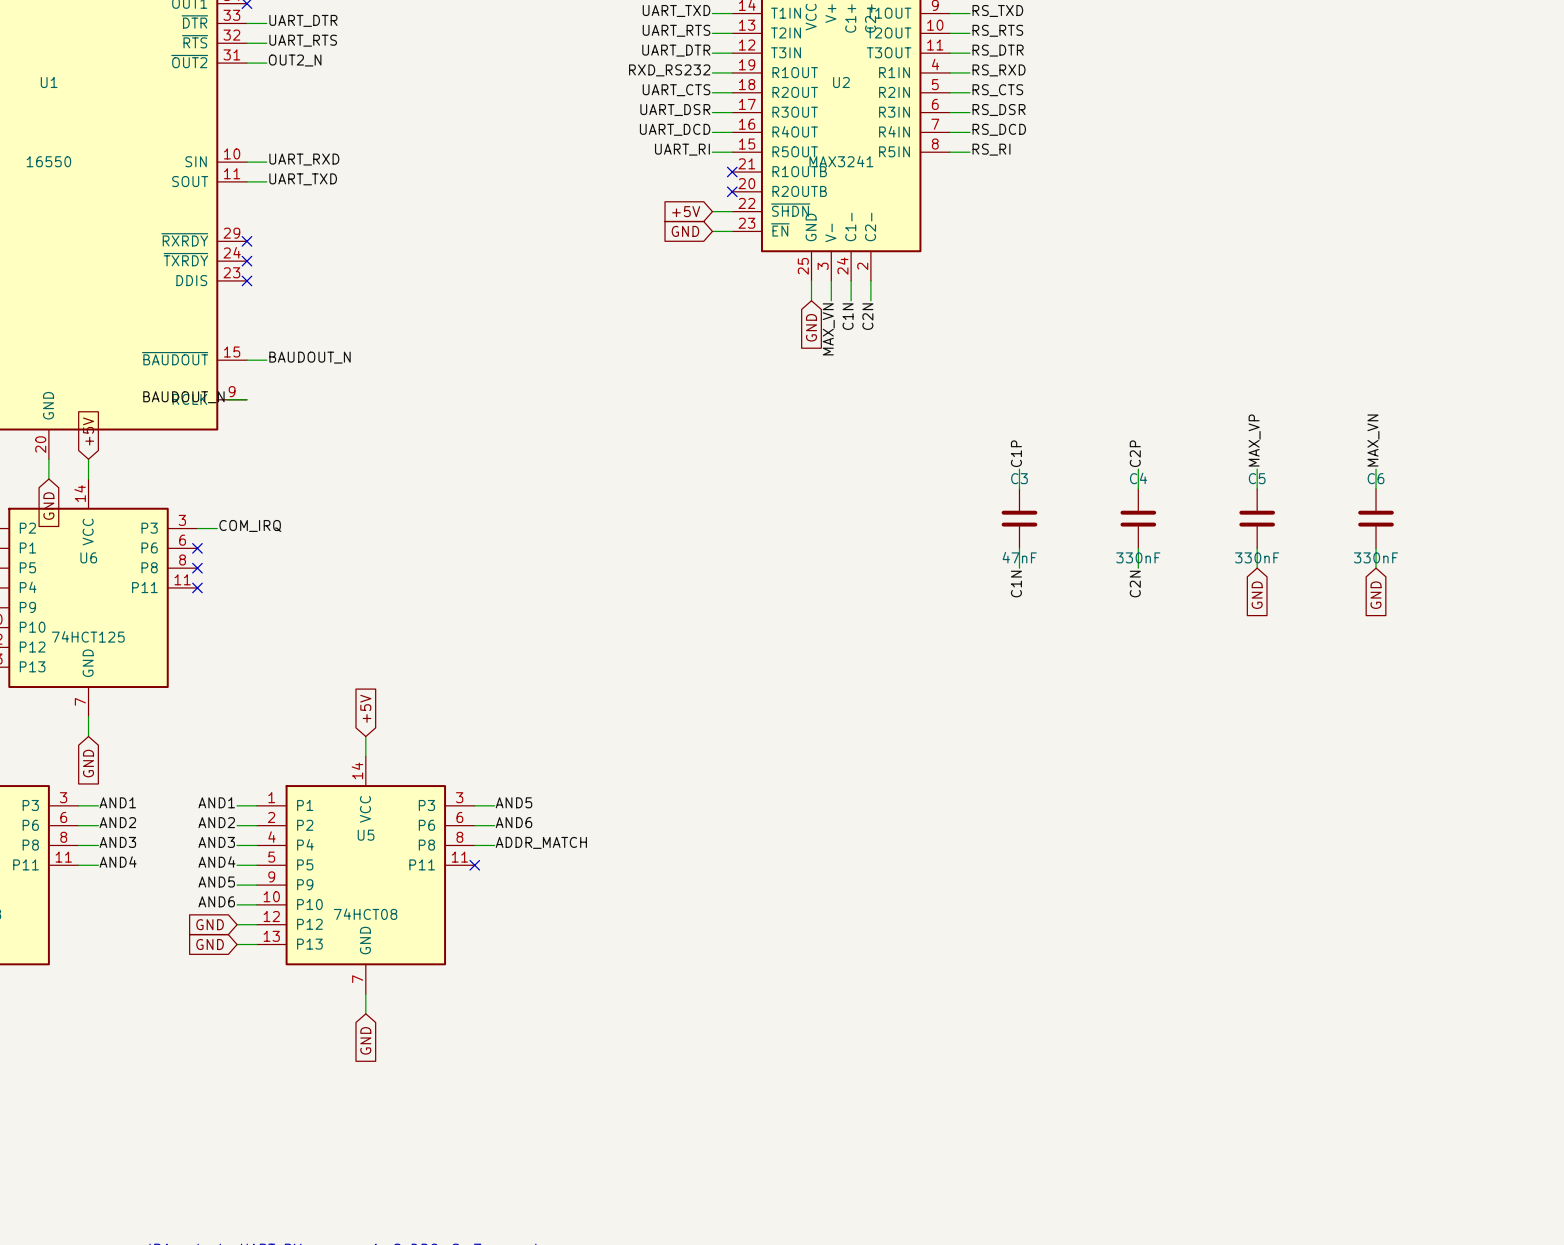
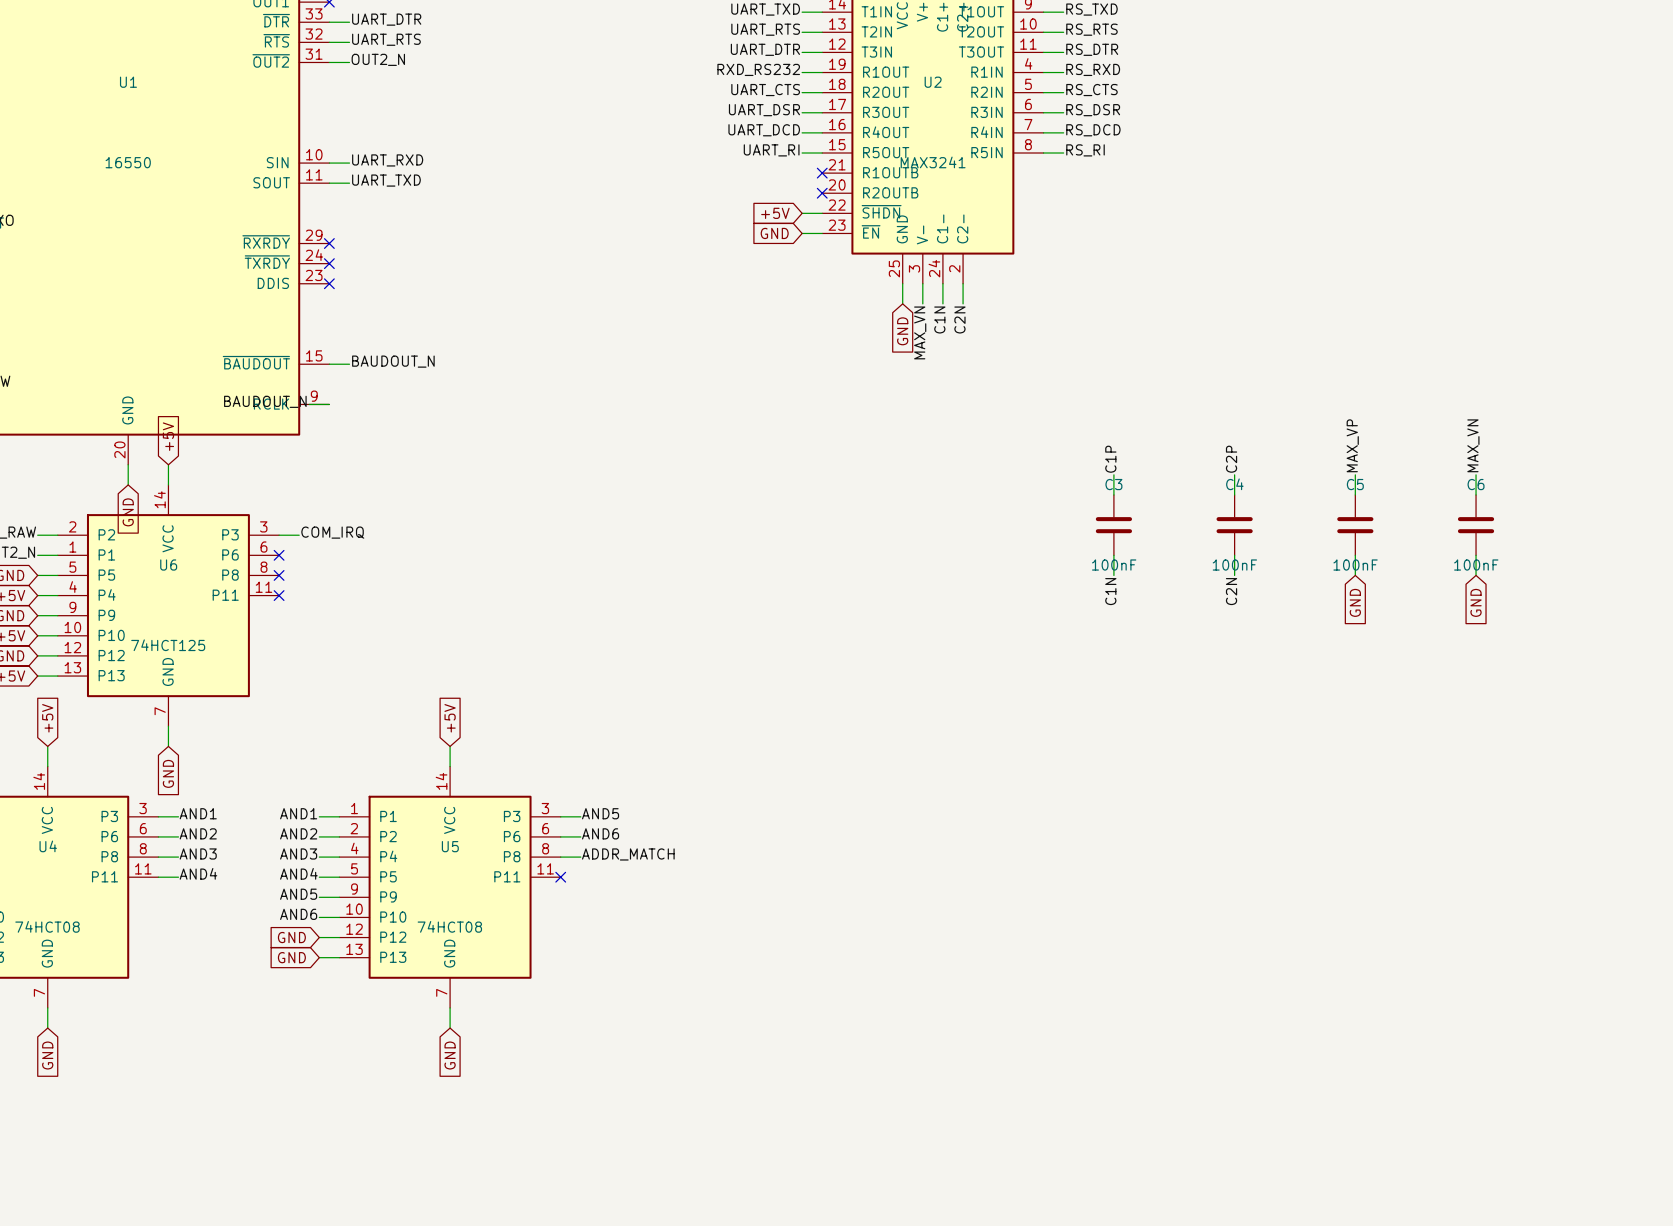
C3 value: 47nF (1019, 557) -> 100nF (1114, 565)
C4 value: 330nF (1138, 557) -> 100nF (1234, 565)
C5 value: 330nF (1257, 557) -> 100nF (1355, 565)
C6 value: 330nF (1376, 557) -> 100nF (1476, 565)

